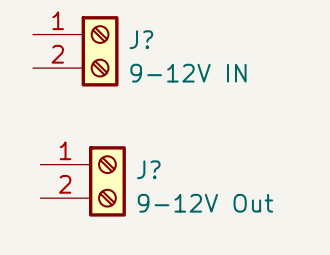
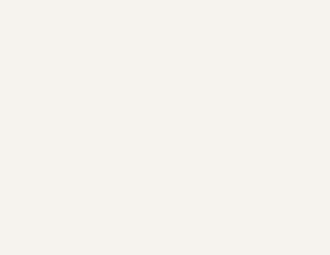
J?: 9-12V IN (75, 51) -> none
J?: 9-12V Out (83, 181) -> none

